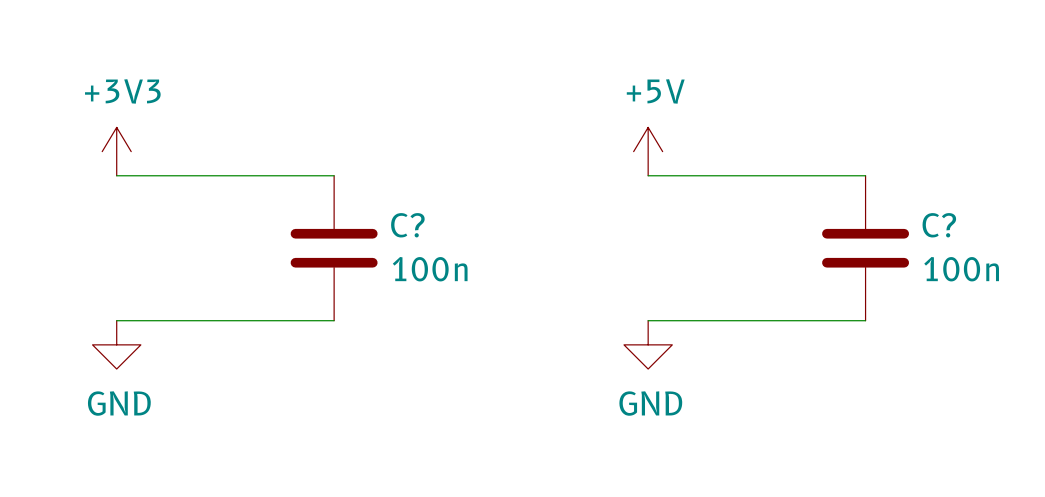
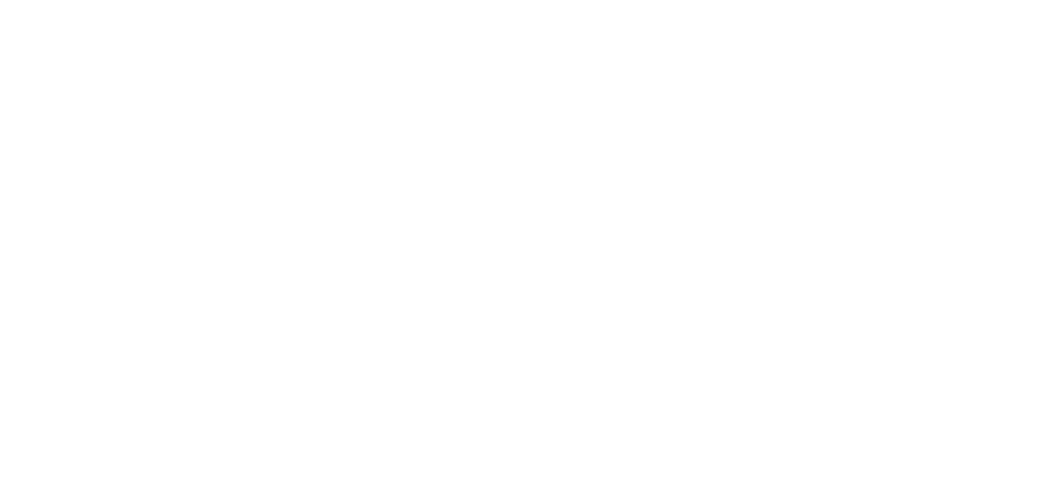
power symbol: +3V3 (116, 151) -> none
power symbol: +5V (648, 151) -> none
wire: (116, 175) (334, 175) -> none
wire: (648, 175) (865, 175) -> none
C?: 100n (334, 248) -> none
C?: 100n (865, 248) -> none
wire: (116, 320) (334, 320) -> none
wire: (648, 320) (865, 320) -> none
power symbol: GND (116, 344) -> none
power symbol: GND (648, 344) -> none

